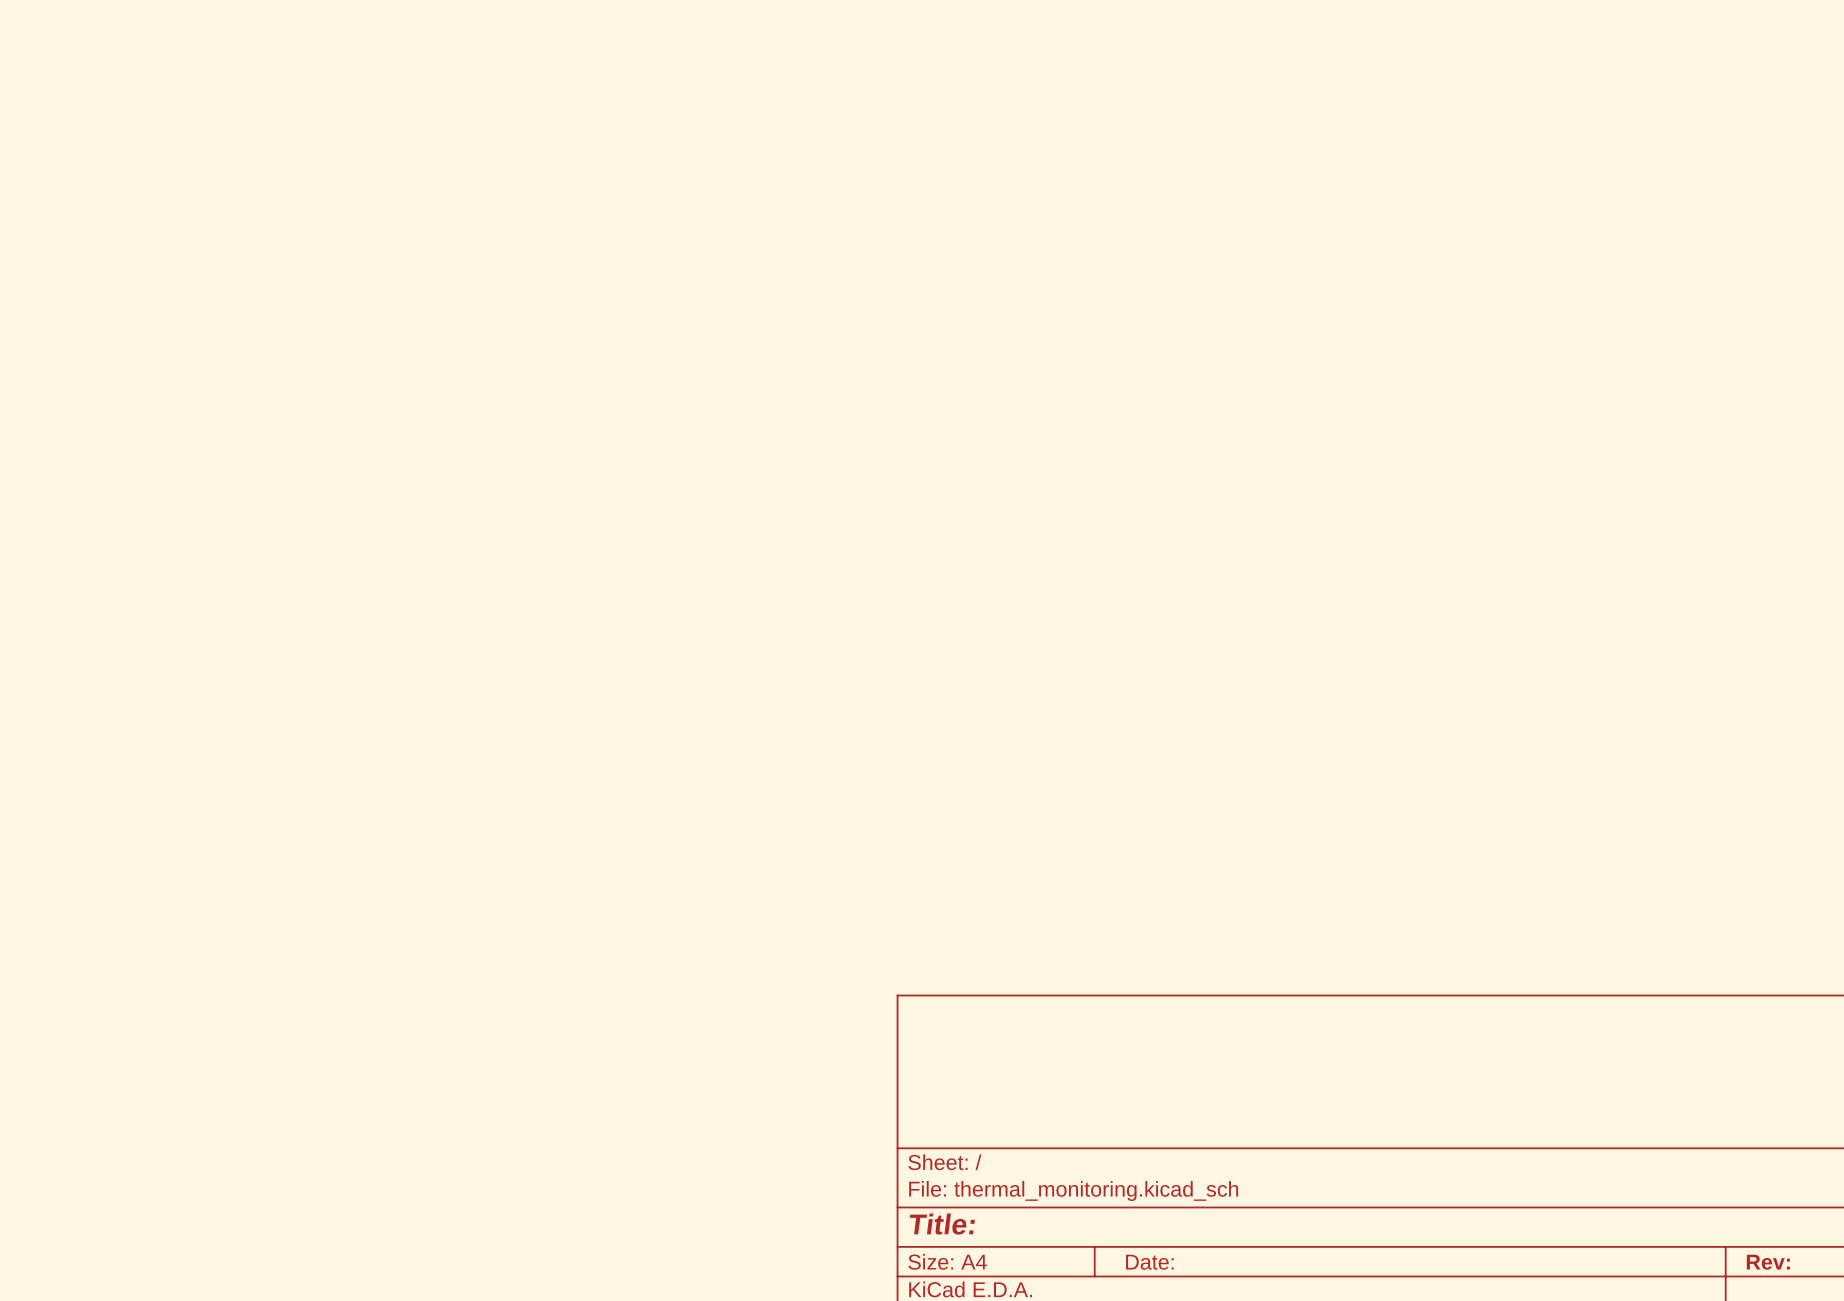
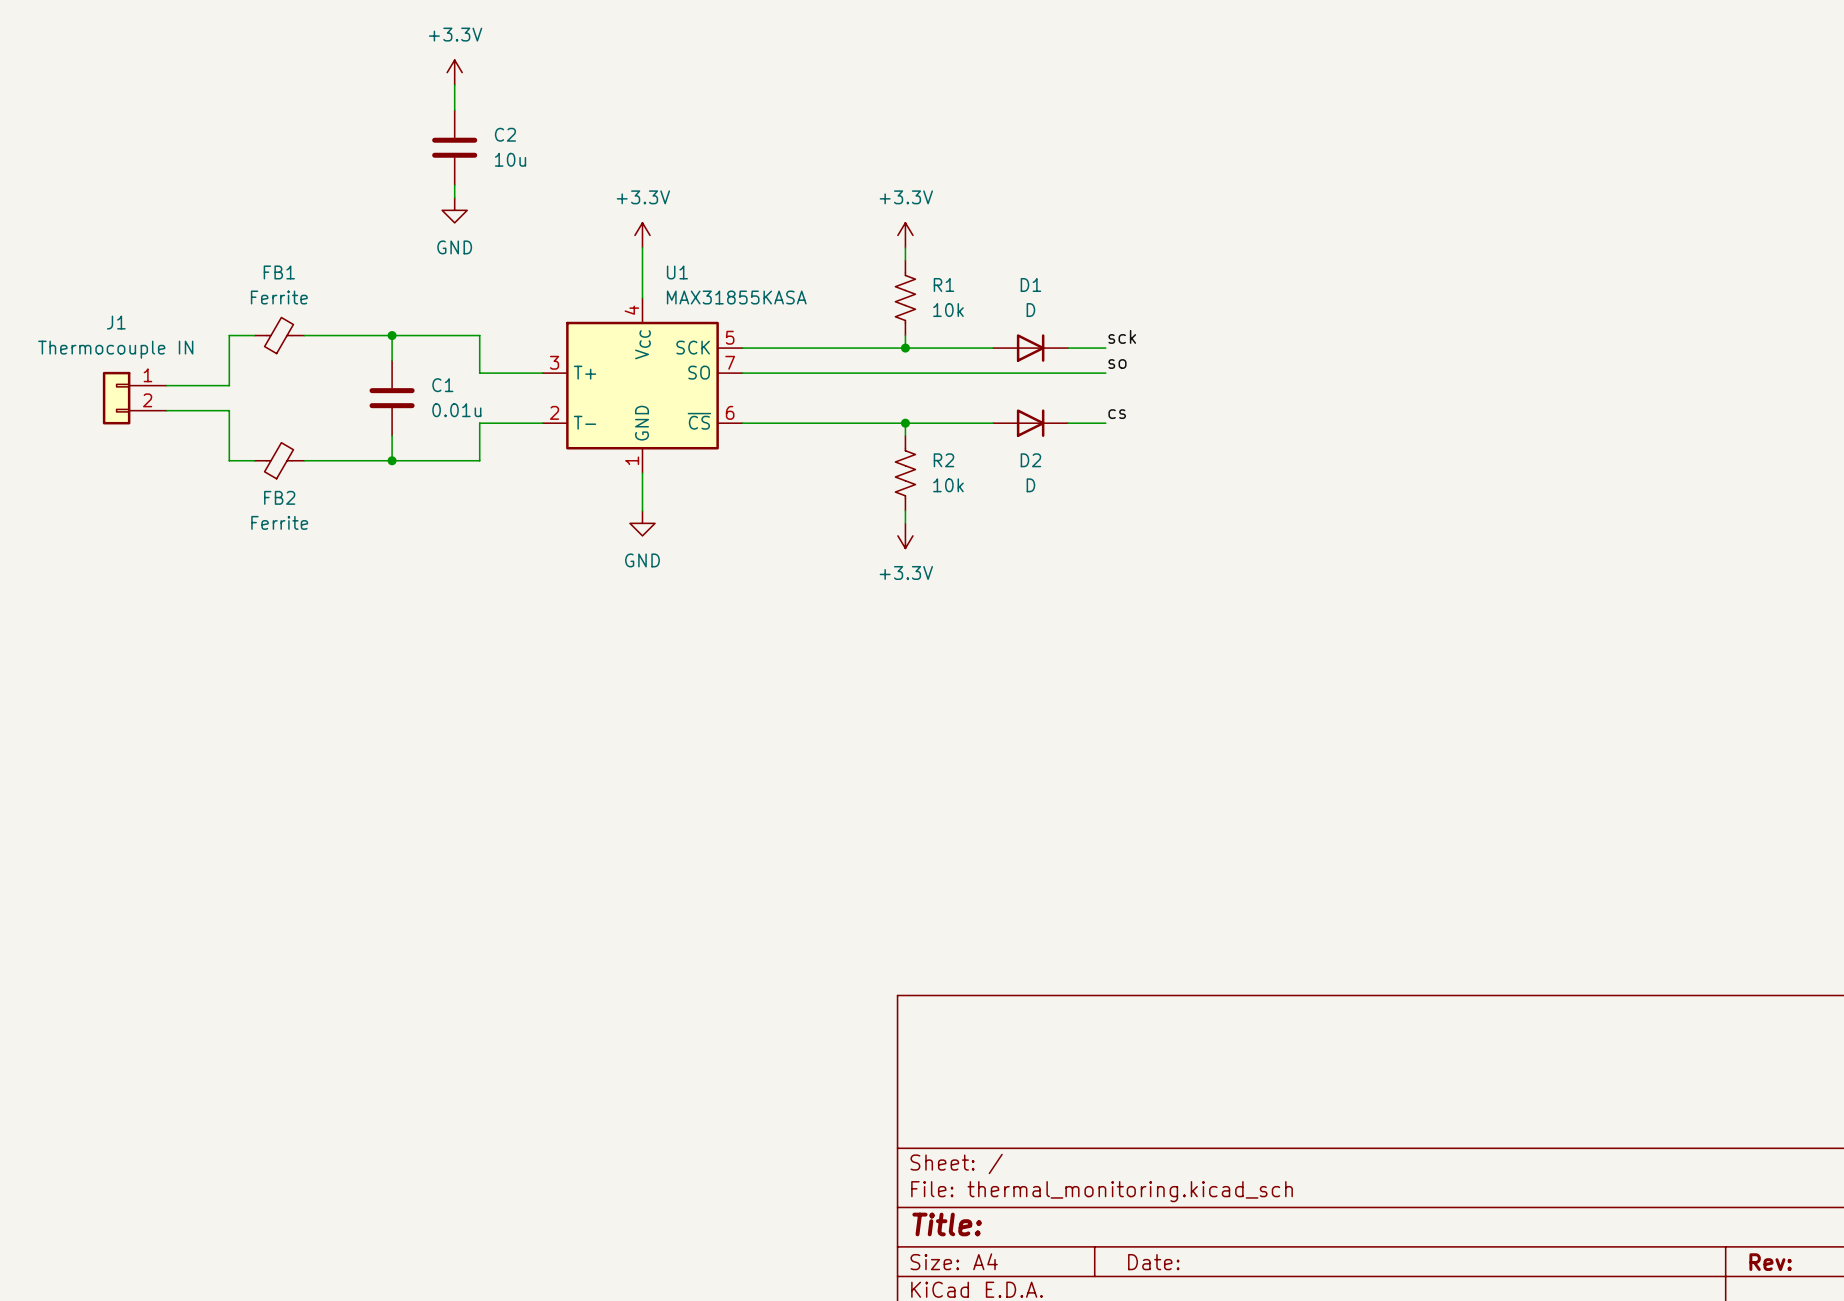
power symbol: none -> +3.3V (454, 72)
wire: none -> (454, 85) (454, 110)
C2: none -> 10u (454, 147)
wire: none -> (454, 185) (454, 197)
power symbol: none -> GND (454, 210)
power symbol: none -> +3.3V (642, 235)
power symbol: none -> +3.3V (905, 235)
wire: none -> (642, 247) (642, 297)
wire: none -> (905, 247) (905, 260)
R1: none -> 10k (905, 297)
wire: none -> (254, 335) (229, 335) (229, 385) (166, 385)
FB1: none -> Ferrite (279, 335)
wire: none -> (304, 335) (479, 335) (479, 373) (542, 373)
wire: none -> (392, 335) (392, 360)
junction: none -> (392, 335)
wire: none -> (905, 335) (905, 348)
label: none -> sck (1122, 336)
wire: none -> (742, 348) (993, 348)
junction: none -> (905, 348)
D1: none -> D (1030, 348)
wire: none -> (1068, 348) (1105, 348)
label: none -> so (1117, 364)
wire: none -> (742, 373) (1105, 373)
U1: none -> MAX31855KASA (642, 385)
J1: none -> Thermocouple IN (134, 398)
C1: none -> 0.01u (392, 398)
wire: none -> (166, 410) (229, 410) (229, 460) (254, 460)
label: none -> cs (1117, 414)
wire: none -> (542, 423) (479, 423) (479, 460) (304, 460)
wire: none -> (742, 423) (993, 423)
wire: none -> (905, 423) (905, 435)
junction: none -> (905, 423)
D2: none -> D (1030, 423)
wire: none -> (1068, 423) (1105, 423)
wire: none -> (392, 435) (392, 460)
FB2: none -> Ferrite (279, 460)
junction: none -> (392, 460)
wire: none -> (642, 473) (642, 510)
R2: none -> 10k (905, 473)
wire: none -> (905, 510) (905, 523)
power symbol: none -> GND (642, 523)
power symbol: none -> +3.3V (905, 535)

